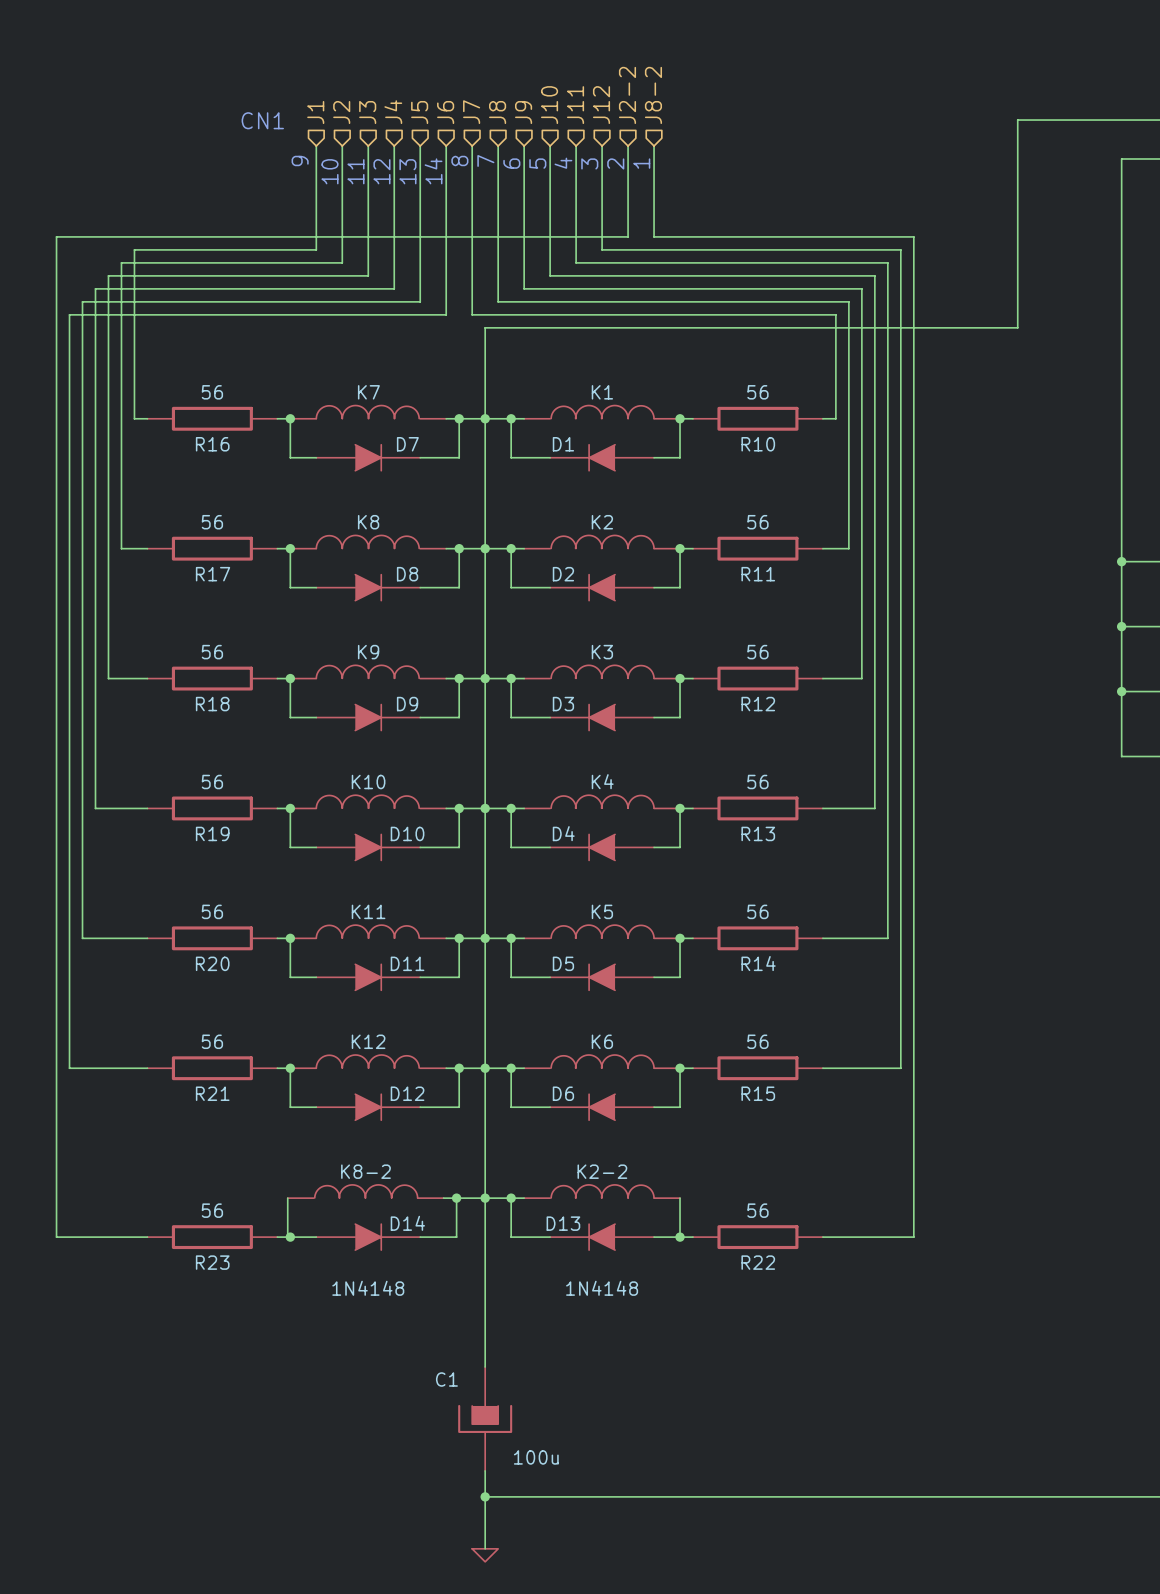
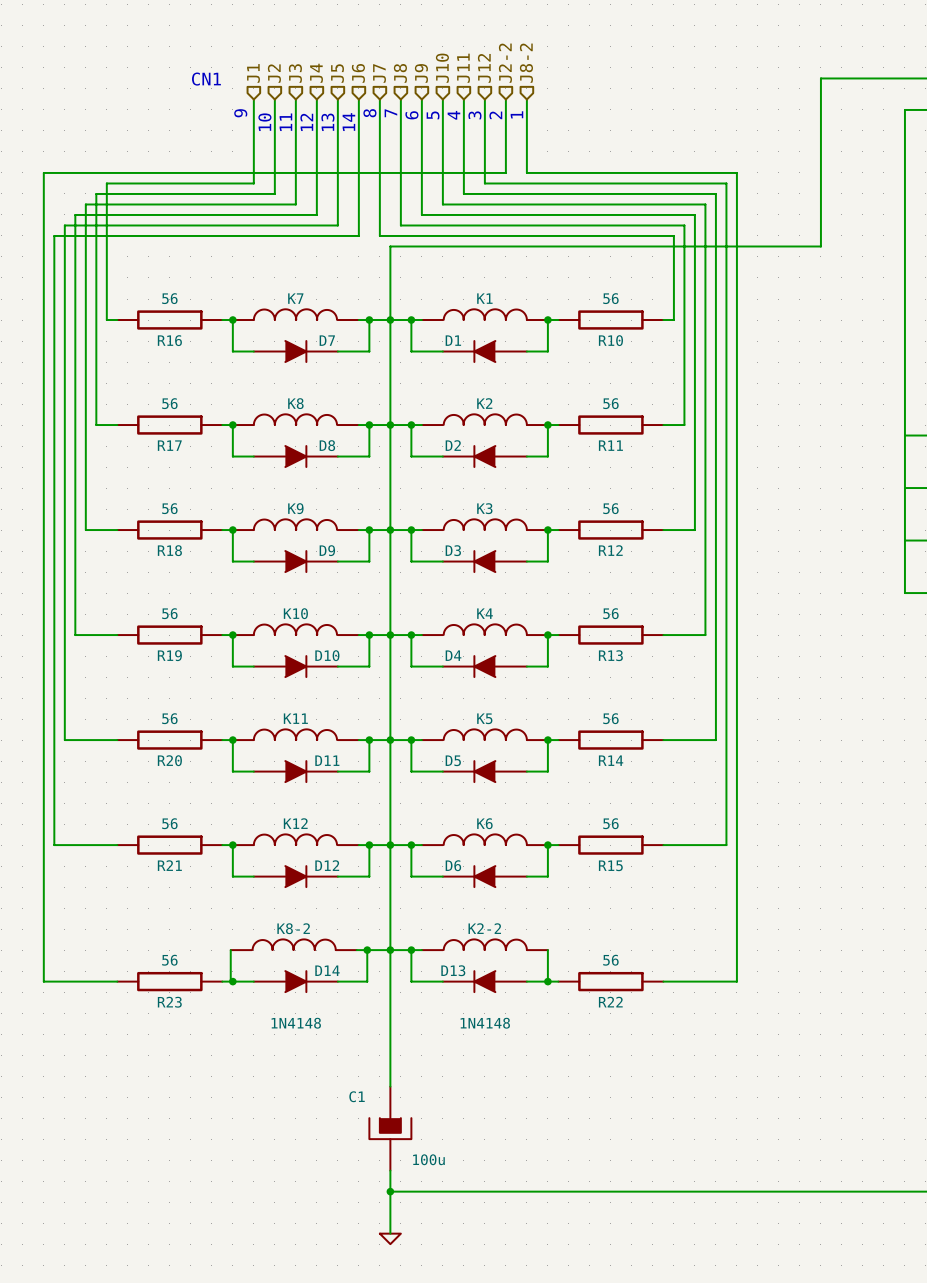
junction: (1121, 561) -> none
junction: (1121, 626) -> none
junction: (1121, 691) -> none

